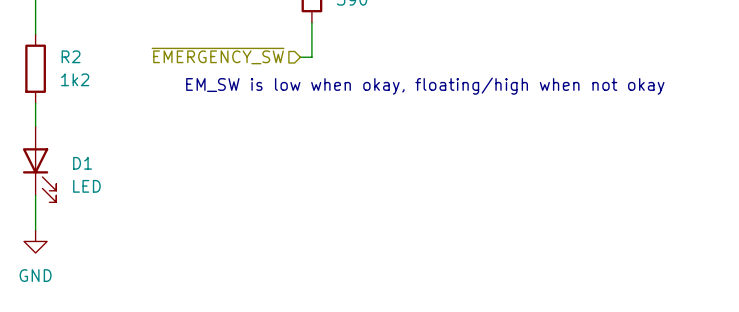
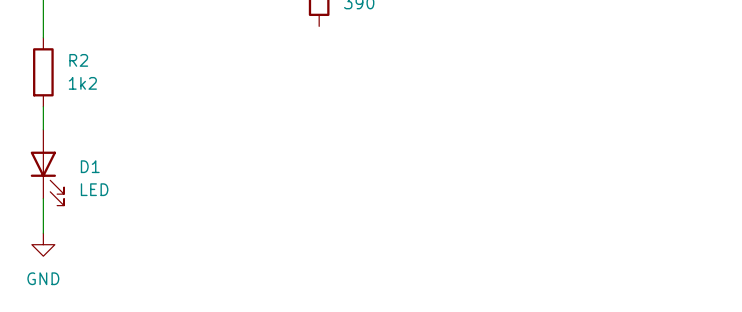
wire: (311, 22) (311, 57) (300, 57) -> none
hierarchical label: ~{EMERGENCY_SW} (218, 56) -> none
text: EM_SW is low when okay, floating/high when not okay (425, 86) -> none

